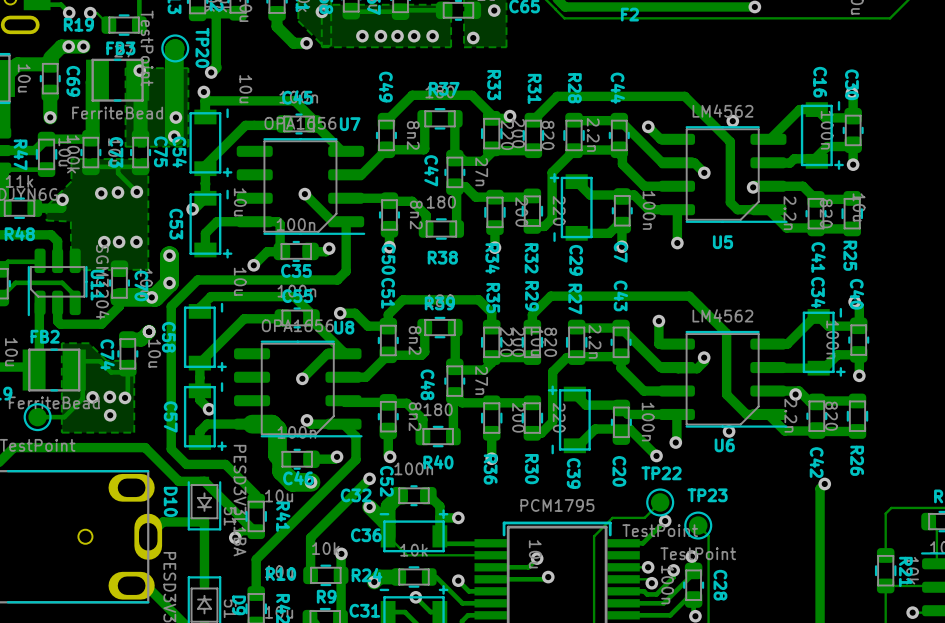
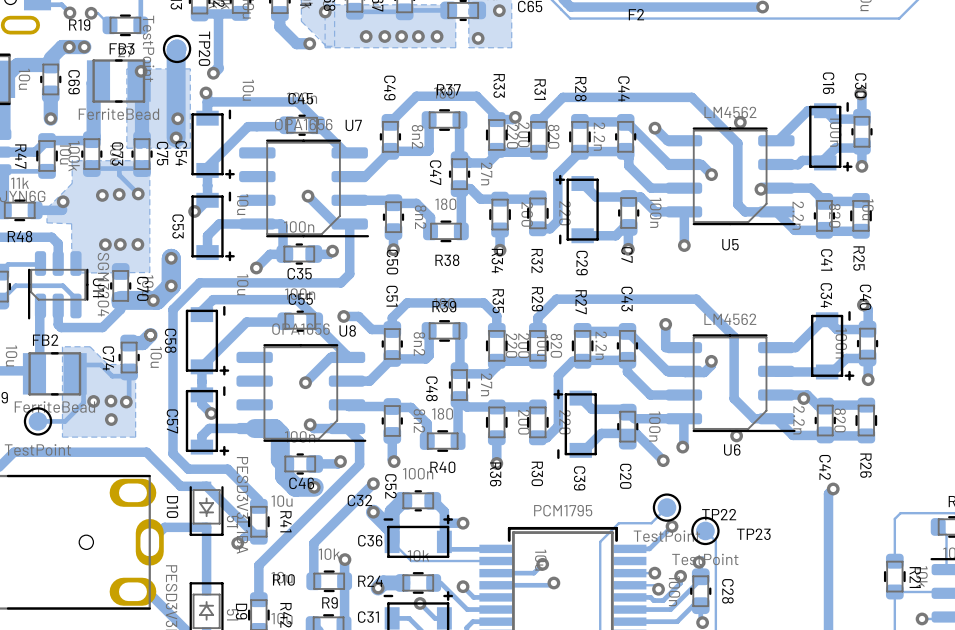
TP22 name position: TP22 (661, 473) -> TP22 (719, 514)
TP23 name position: TP23 (707, 495) -> TP23 (753, 534)

